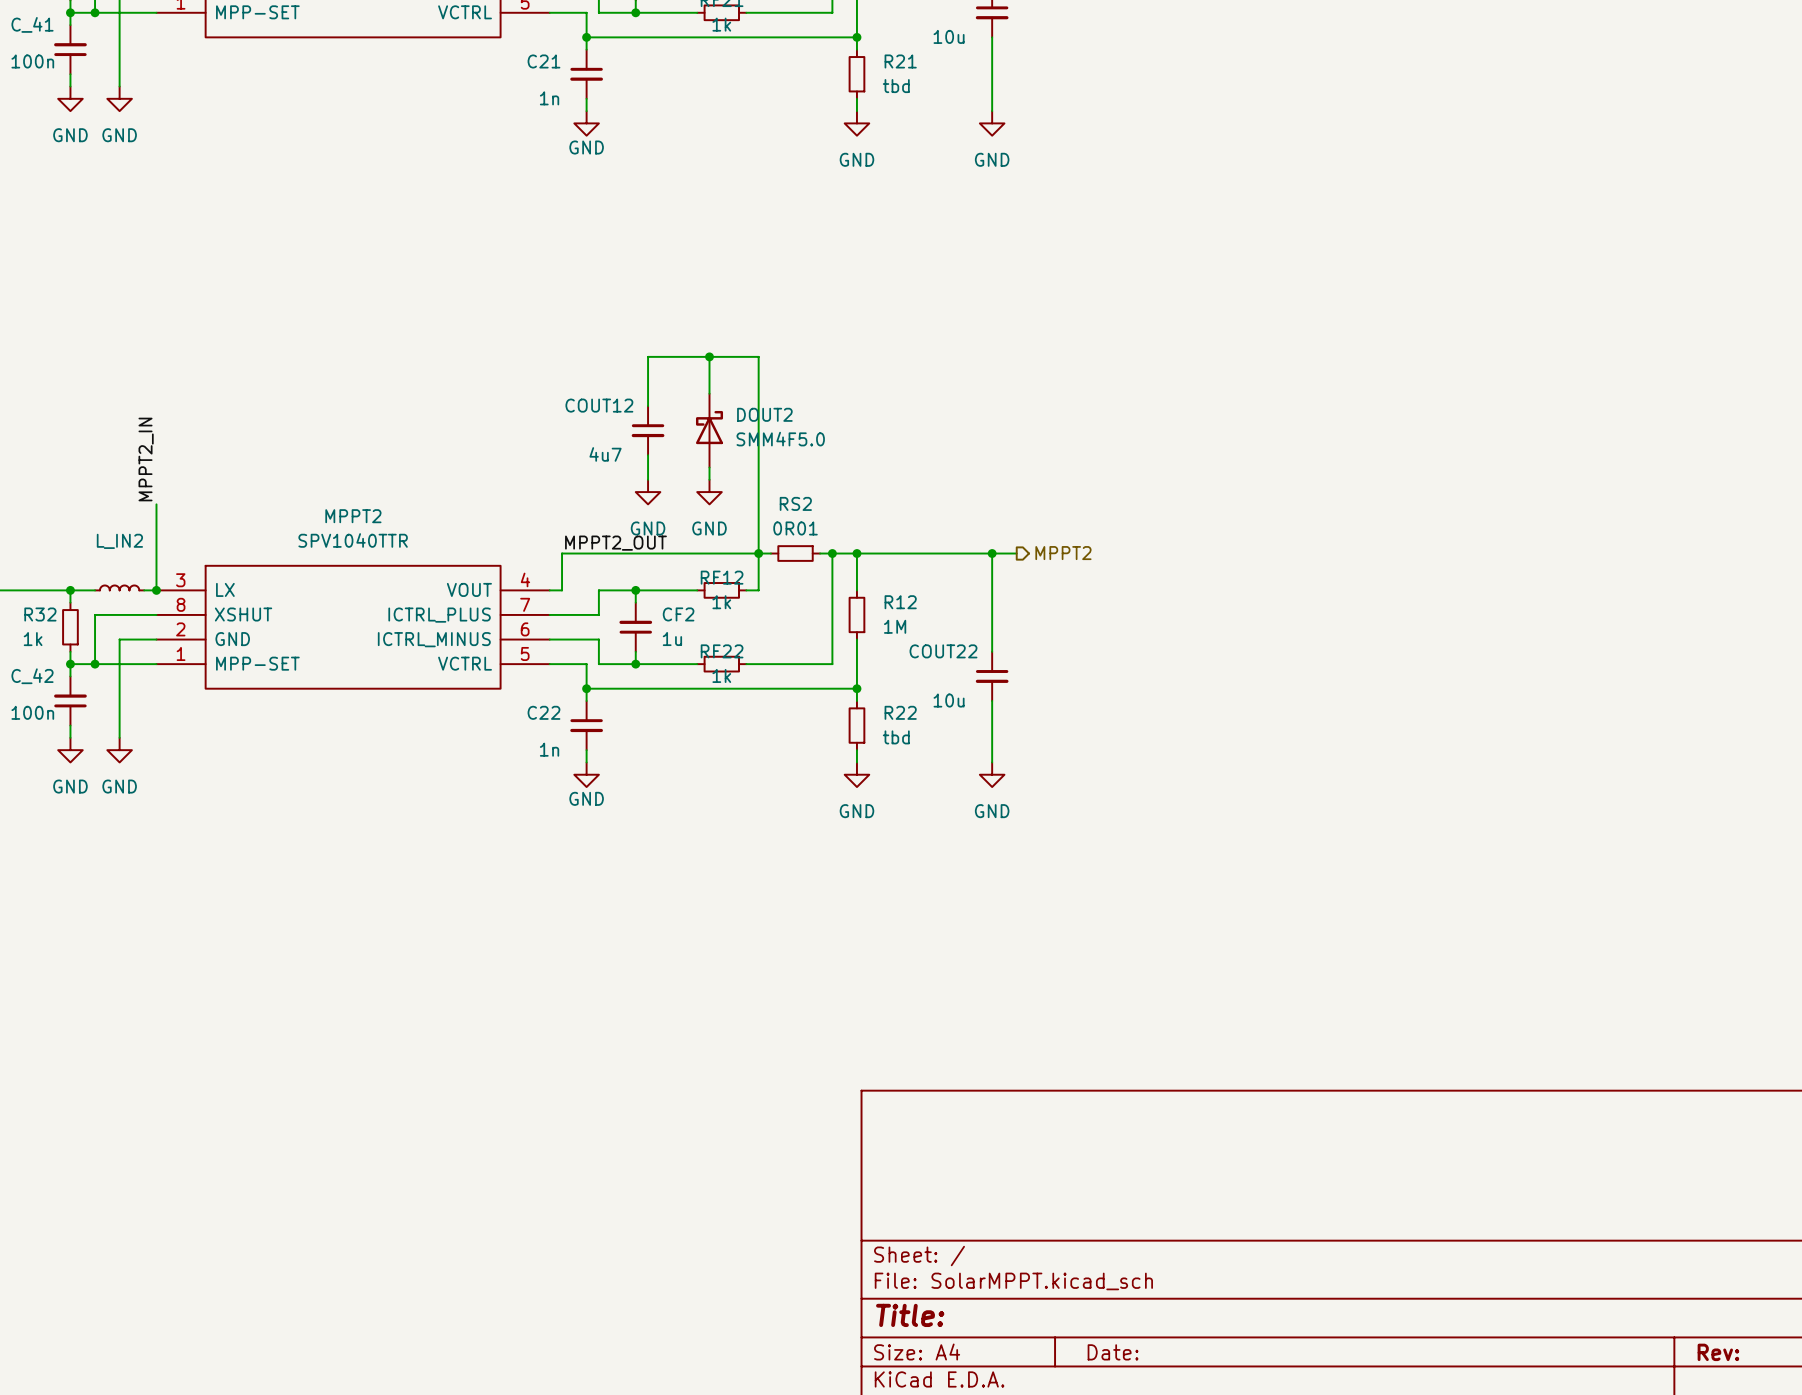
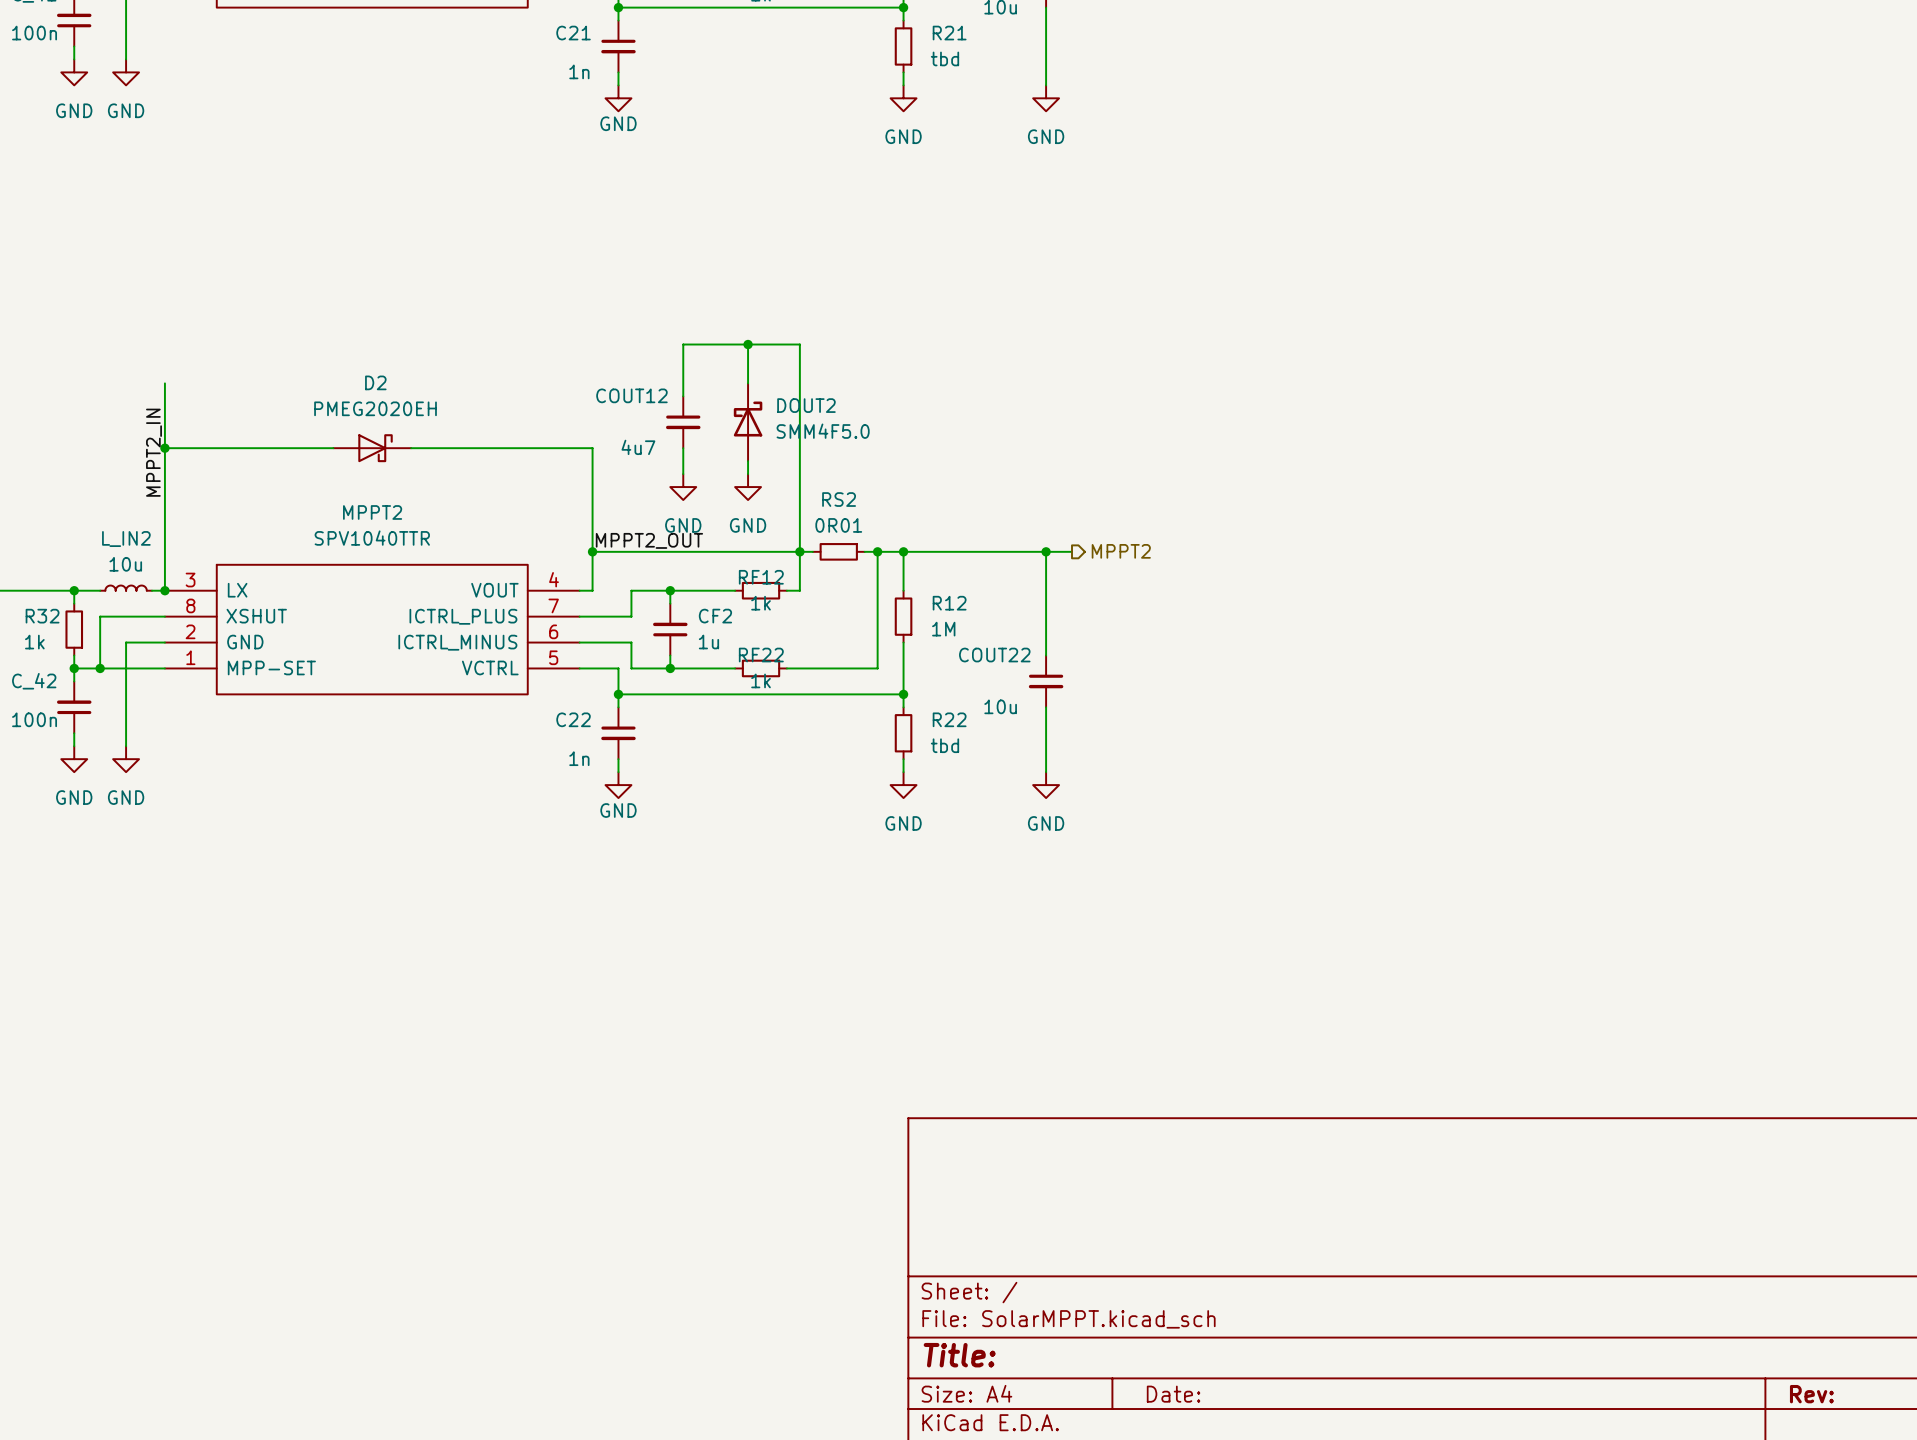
wire: none -> (164, 383) (164, 500)
wire: none -> (164, 448) (333, 448)
junction: none -> (164, 448)
D2: none -> PMEG2020EH (372, 448)
wire: none -> (411, 448) (592, 448) (592, 551)
junction: none -> (592, 551)
L_IN2 value: none -> 10u (125, 564)

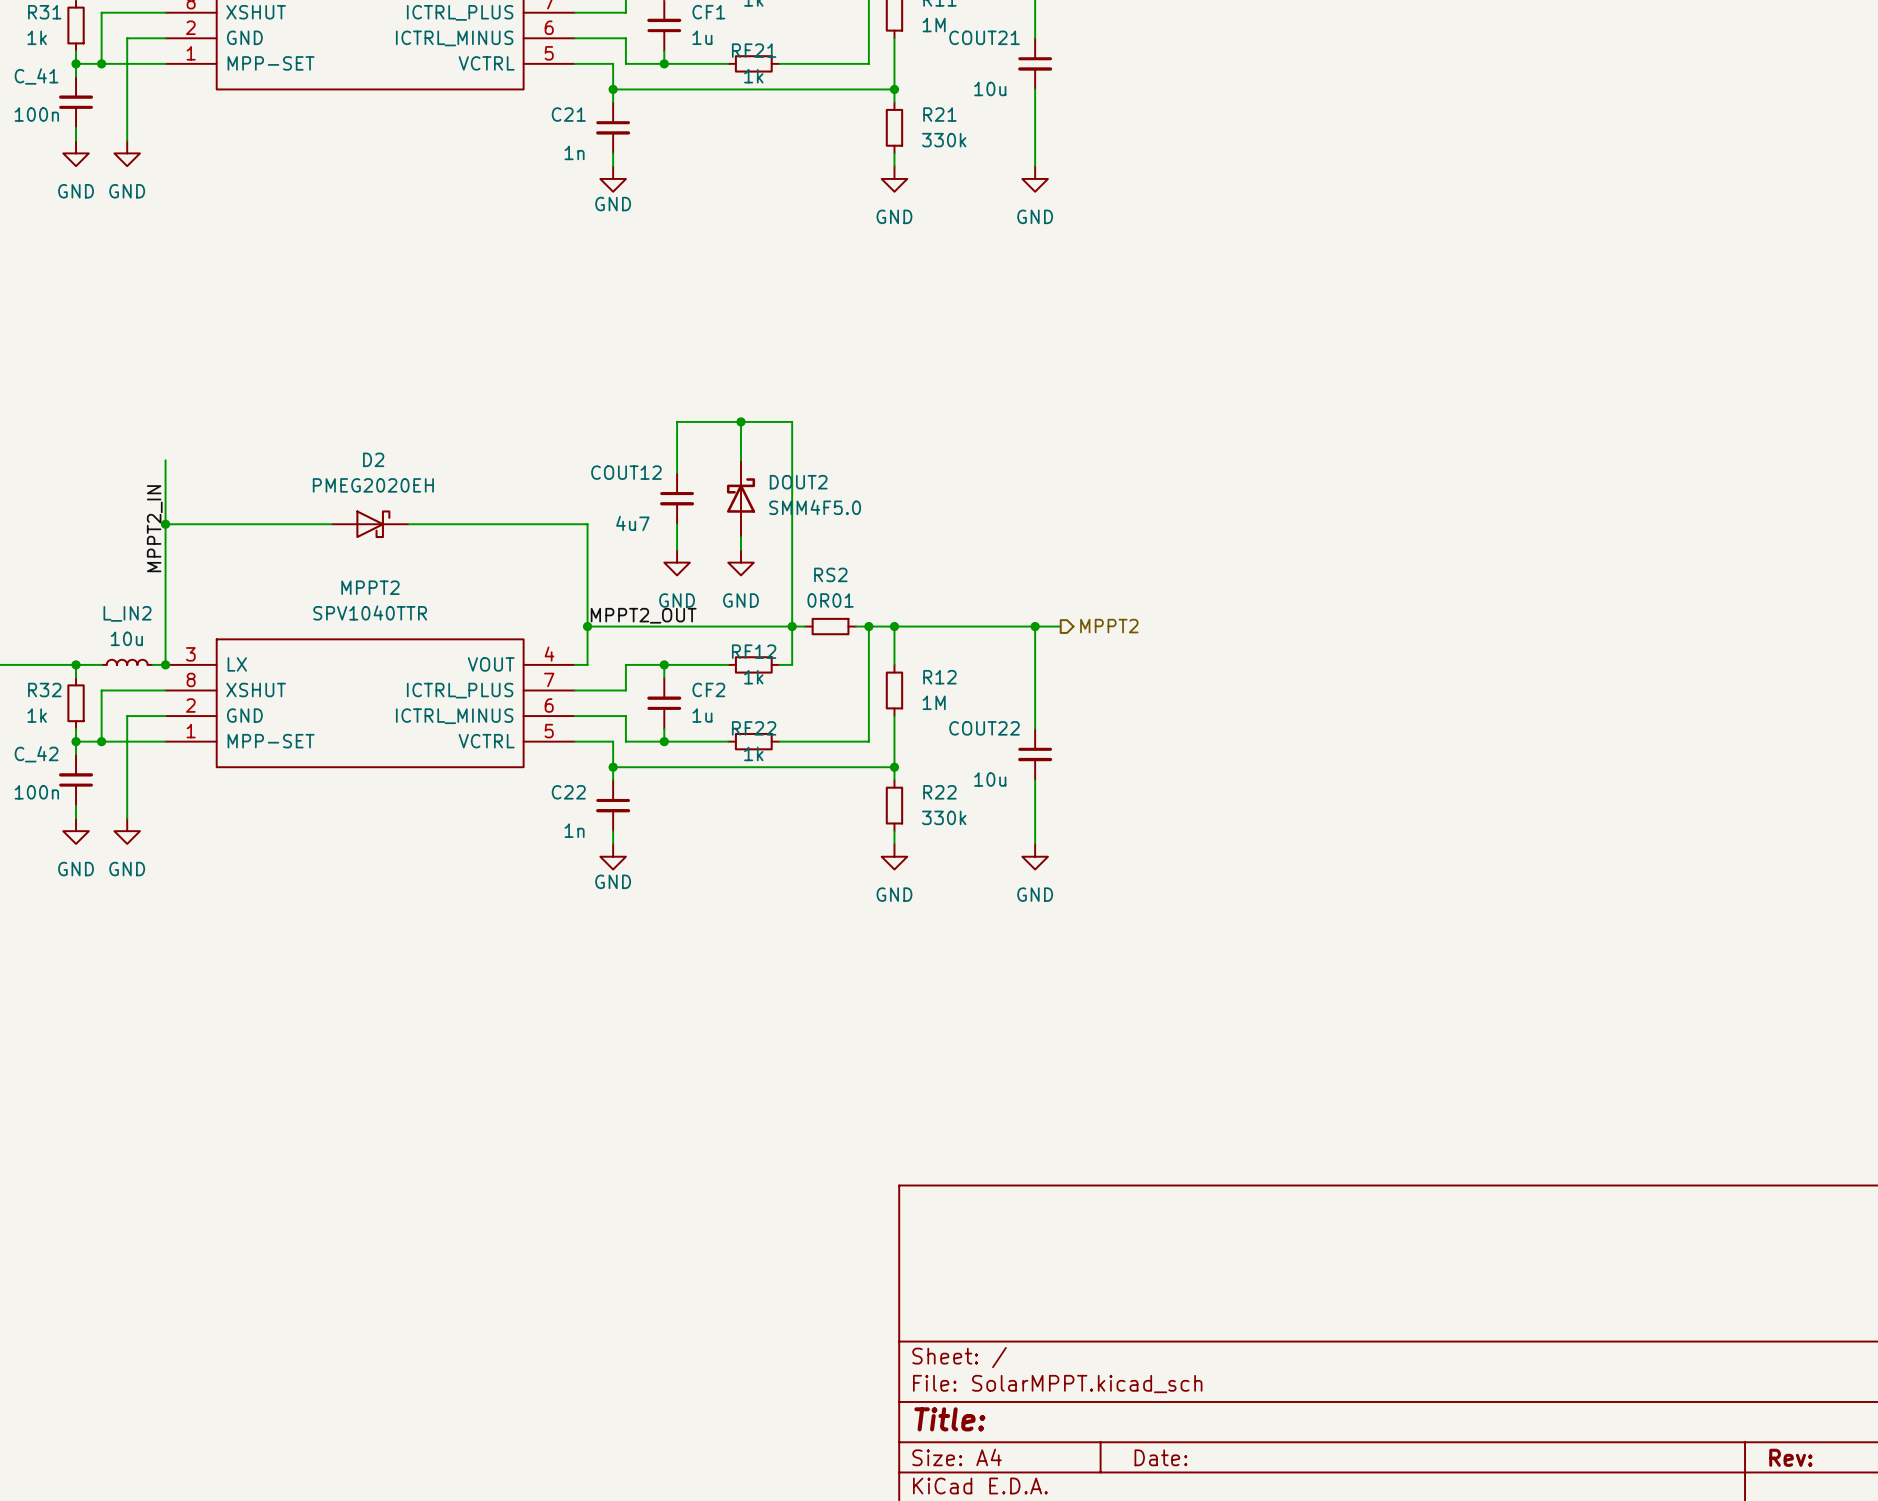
R21 value: tbd (944, 58) -> 330k (944, 140)
R22 value: tbd (944, 745) -> 330k (944, 817)

